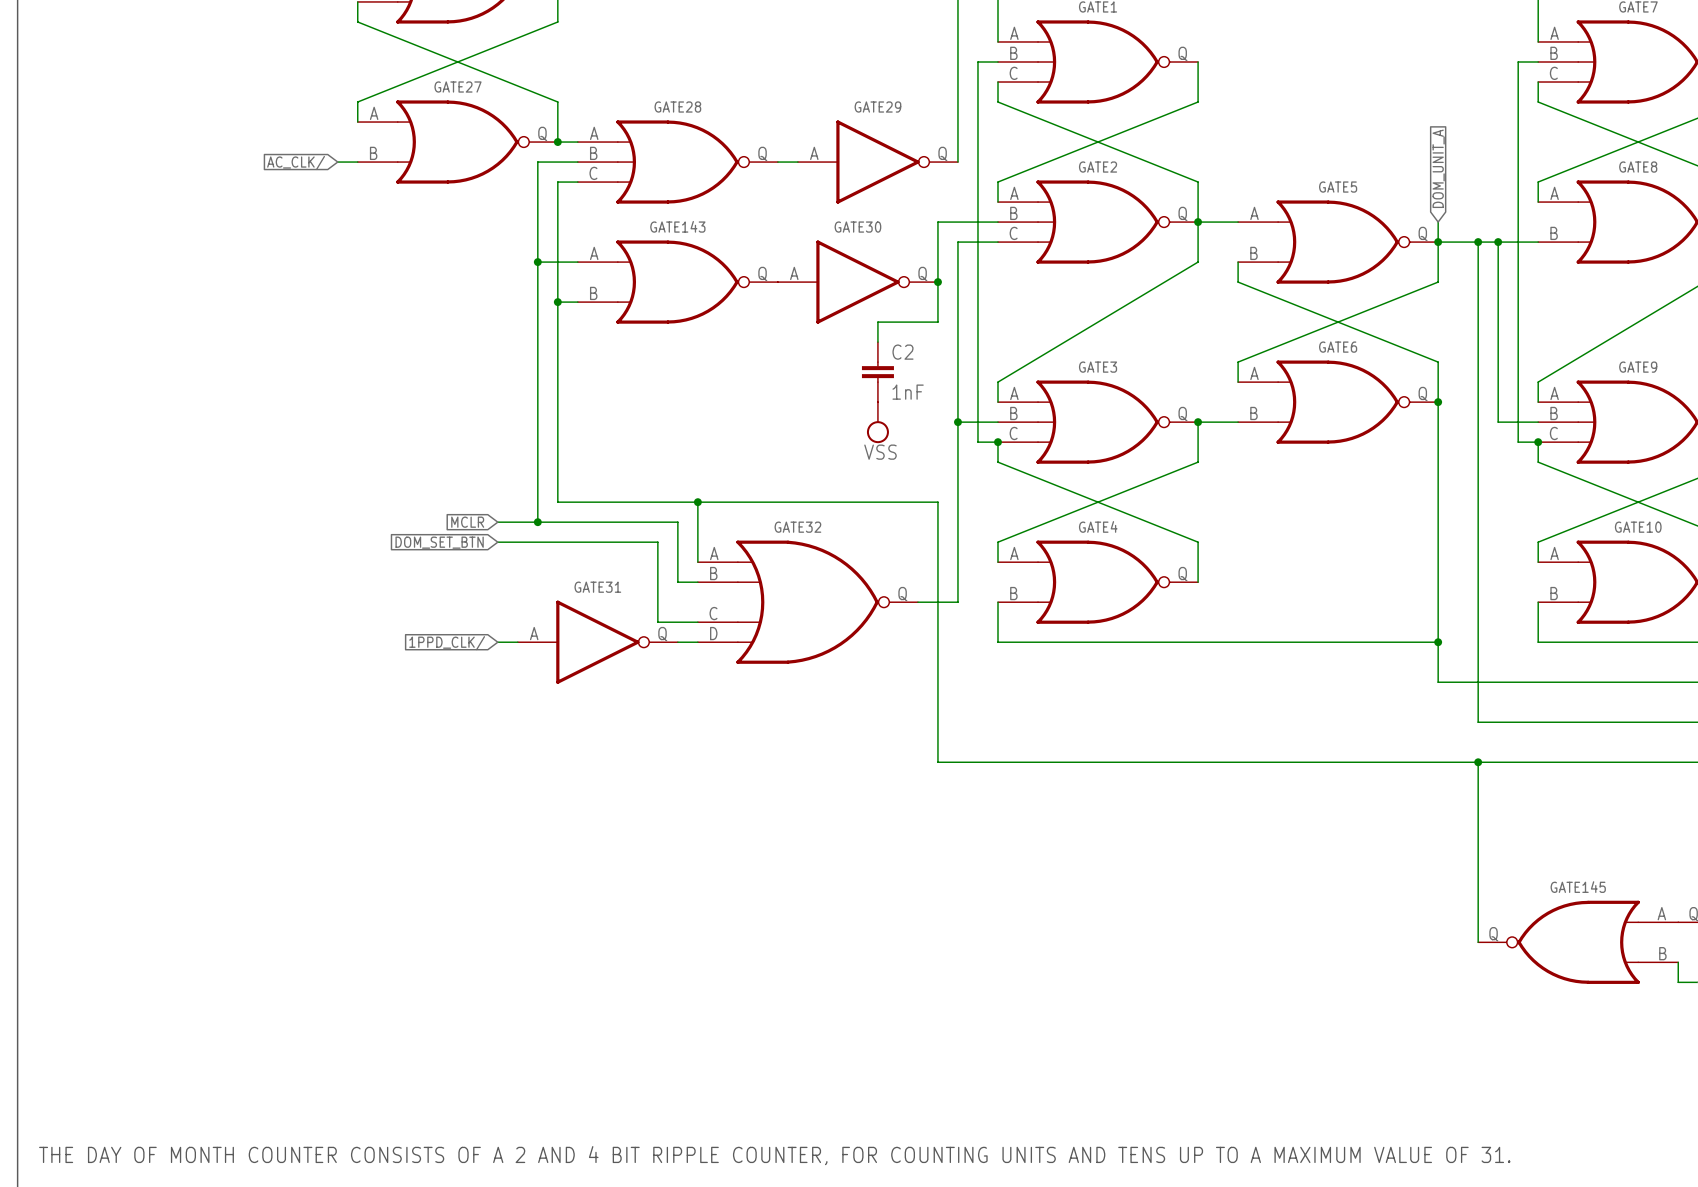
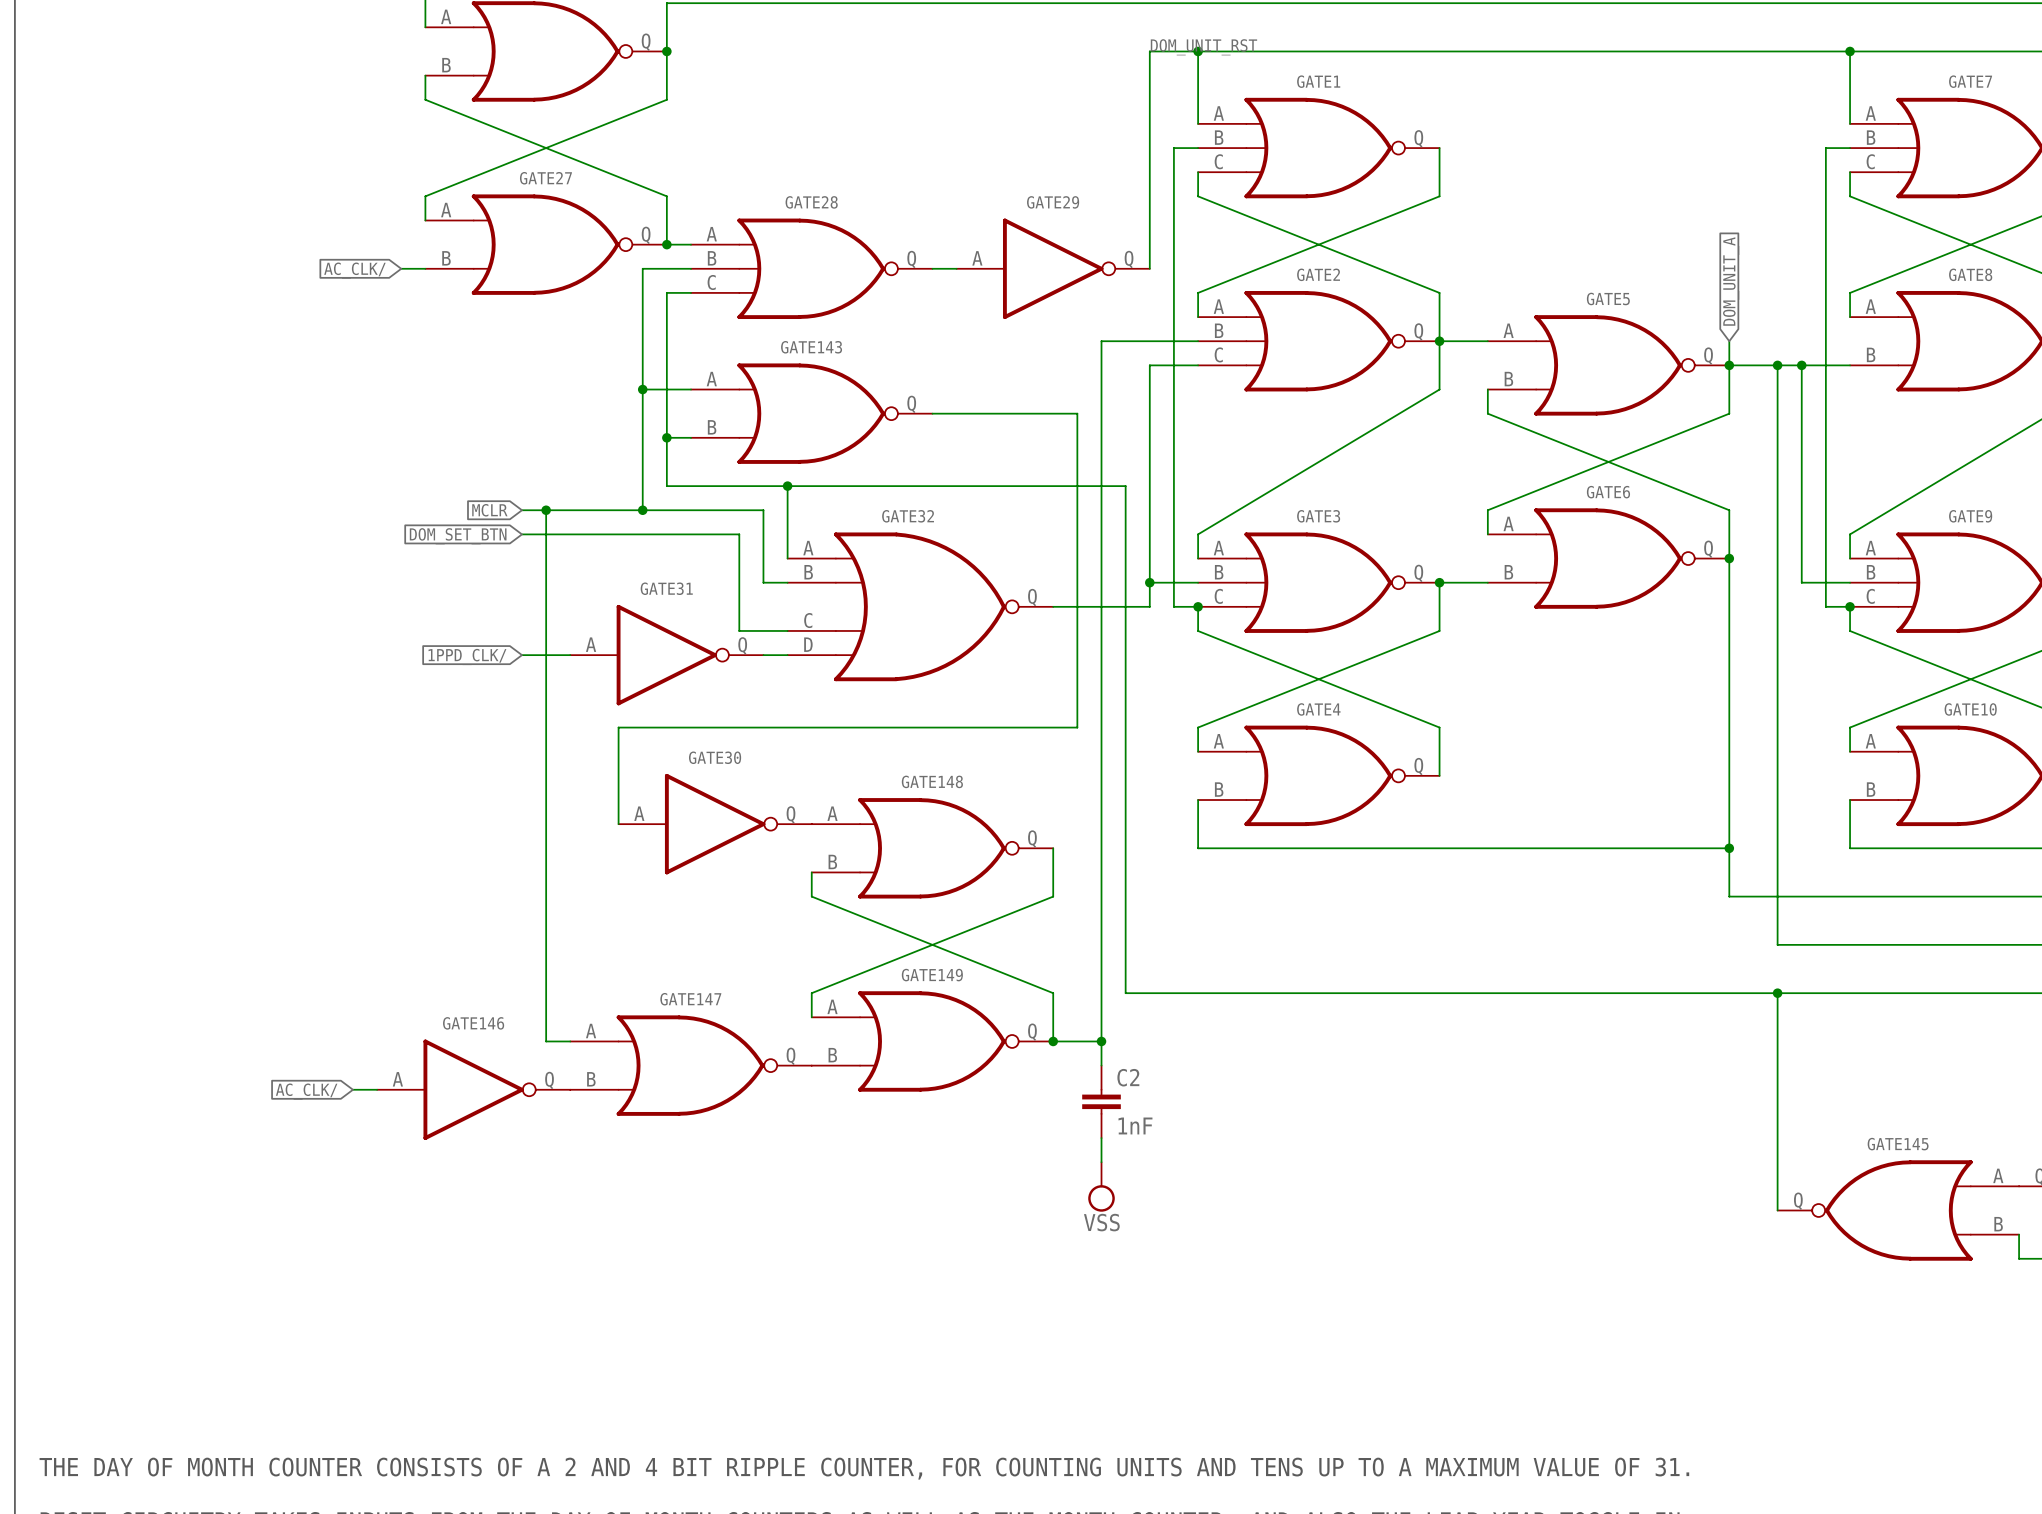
wire: (937, 222) (937, 322) (877, 322) (877, 342) -> (1125, 341) (1101, 341) (1101, 1065)
GATE30 position: (857, 282) -> (715, 824)
junction: (937, 282) -> none
wire: (557, 342) (557, 502) (937, 502) -> (666, 486) (1125, 486) (1125, 679)
junction: none -> (787, 486)
wire: none -> (521, 510) (763, 510) (763, 582) (787, 582)
wire: none -> (546, 510) (546, 1041) (570, 1041)
junction: none -> (546, 510)
wire: (537, 362) (537, 522) -> none
junction: none -> (642, 510)
C2 position: (877, 372) -> (1101, 1101)
wire: none -> (521, 534) (739, 534) (739, 630) (787, 630)
power symbol: VSS (877, 422) -> none
wire: (957, 442) (957, 602) (917, 602) -> (1149, 606) (1053, 606)
wire: none -> (521, 655) (570, 655)
wire: (697, 502) (697, 562) -> (787, 486) (787, 558)
junction: (697, 502) -> none
global label position: MCLR (467, 522) -> MCLR (489, 510)
wire: (497, 522) (677, 522) (677, 582) (697, 582) -> none
junction: (537, 522) -> none
global label position: DOM_SET_BTN (439, 542) -> DOM_SET_BTN (458, 536)
wire: (497, 542) (517, 542) -> (618, 824) (618, 727)
wire: (657, 542) (657, 622) (697, 622) -> (787, 727) (1077, 727) (1077, 413) (932, 413)
GATE32 position: (807, 602) -> (920, 606)
wire: (497, 642) (517, 642) -> none
GATE31 position: (597, 642) -> (666, 655)
wire: (677, 642) (697, 642) -> (763, 655) (787, 655)
GATE148: none -> (932, 848)
wire: none -> (1053, 848) (1053, 896) (811, 993) (811, 1017)
global label position: 1PPD_CLK/ (447, 643) -> 1PPD_CLK/ (467, 656)
wire: none -> (811, 872) (811, 896) (1053, 993) (1053, 1041) (1101, 1041)
GATE149: none -> (932, 1041)
junction: none -> (1053, 1041)
junction: none -> (1101, 1041)
GATE147: none -> (691, 1065)
wire: none -> (352, 1089) (377, 1089)
GATE146: none -> (473, 1089)
global label: none -> AC_CLK/ (306, 1091)
wire: none -> (1101, 1138) (1101, 1162)
power symbol: none -> VSS (1101, 1186)

